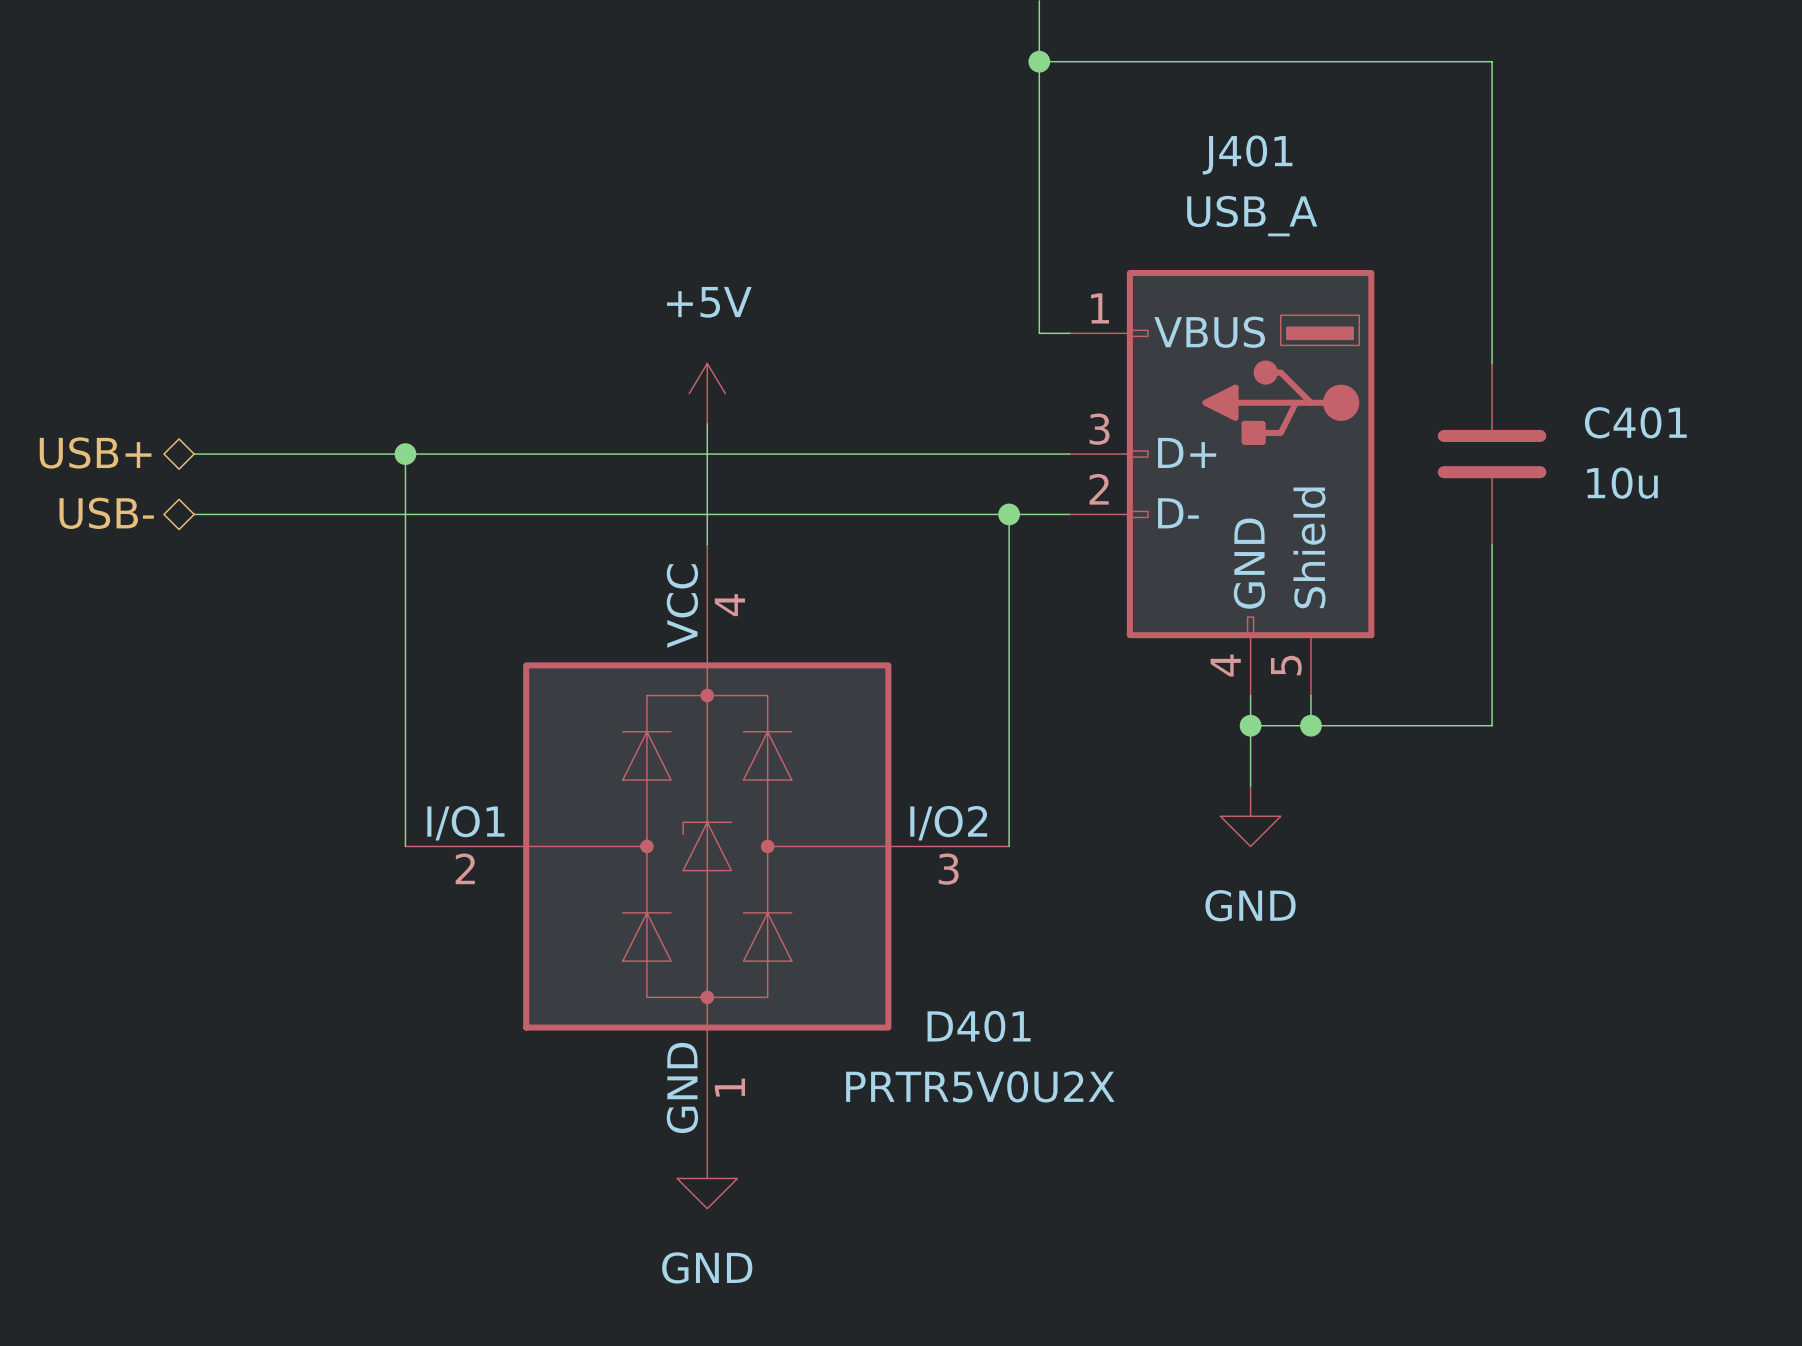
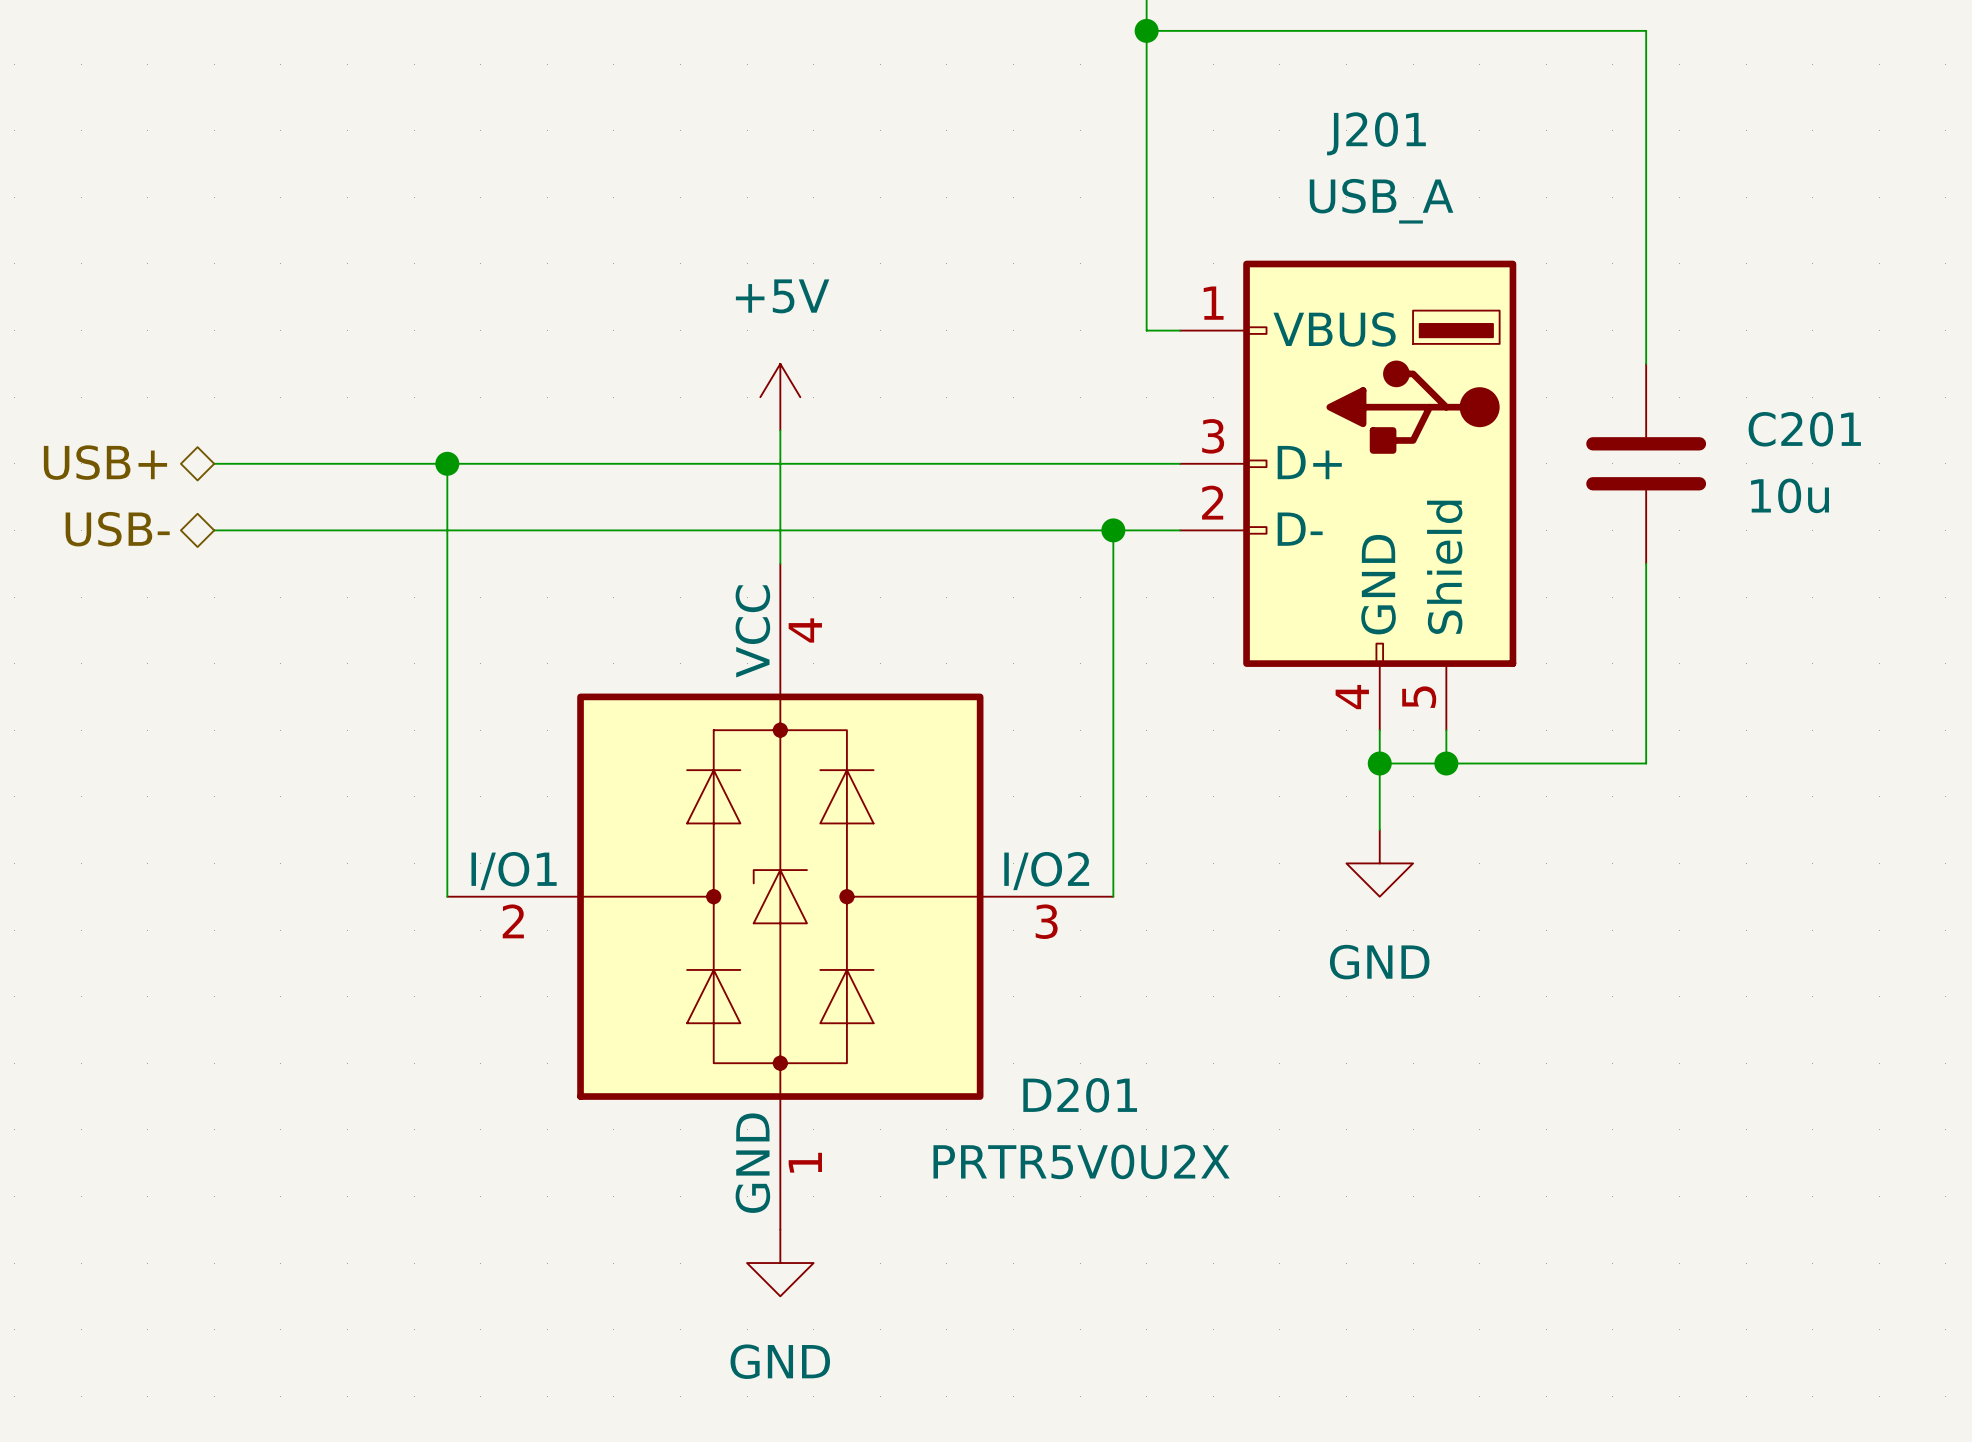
J401 name: J401 (1247, 154) -> J201 (1376, 133)
C401 name: C401 (1635, 422) -> C201 (1804, 429)
D401 name: D401 (979, 1026) -> D201 (1080, 1095)

